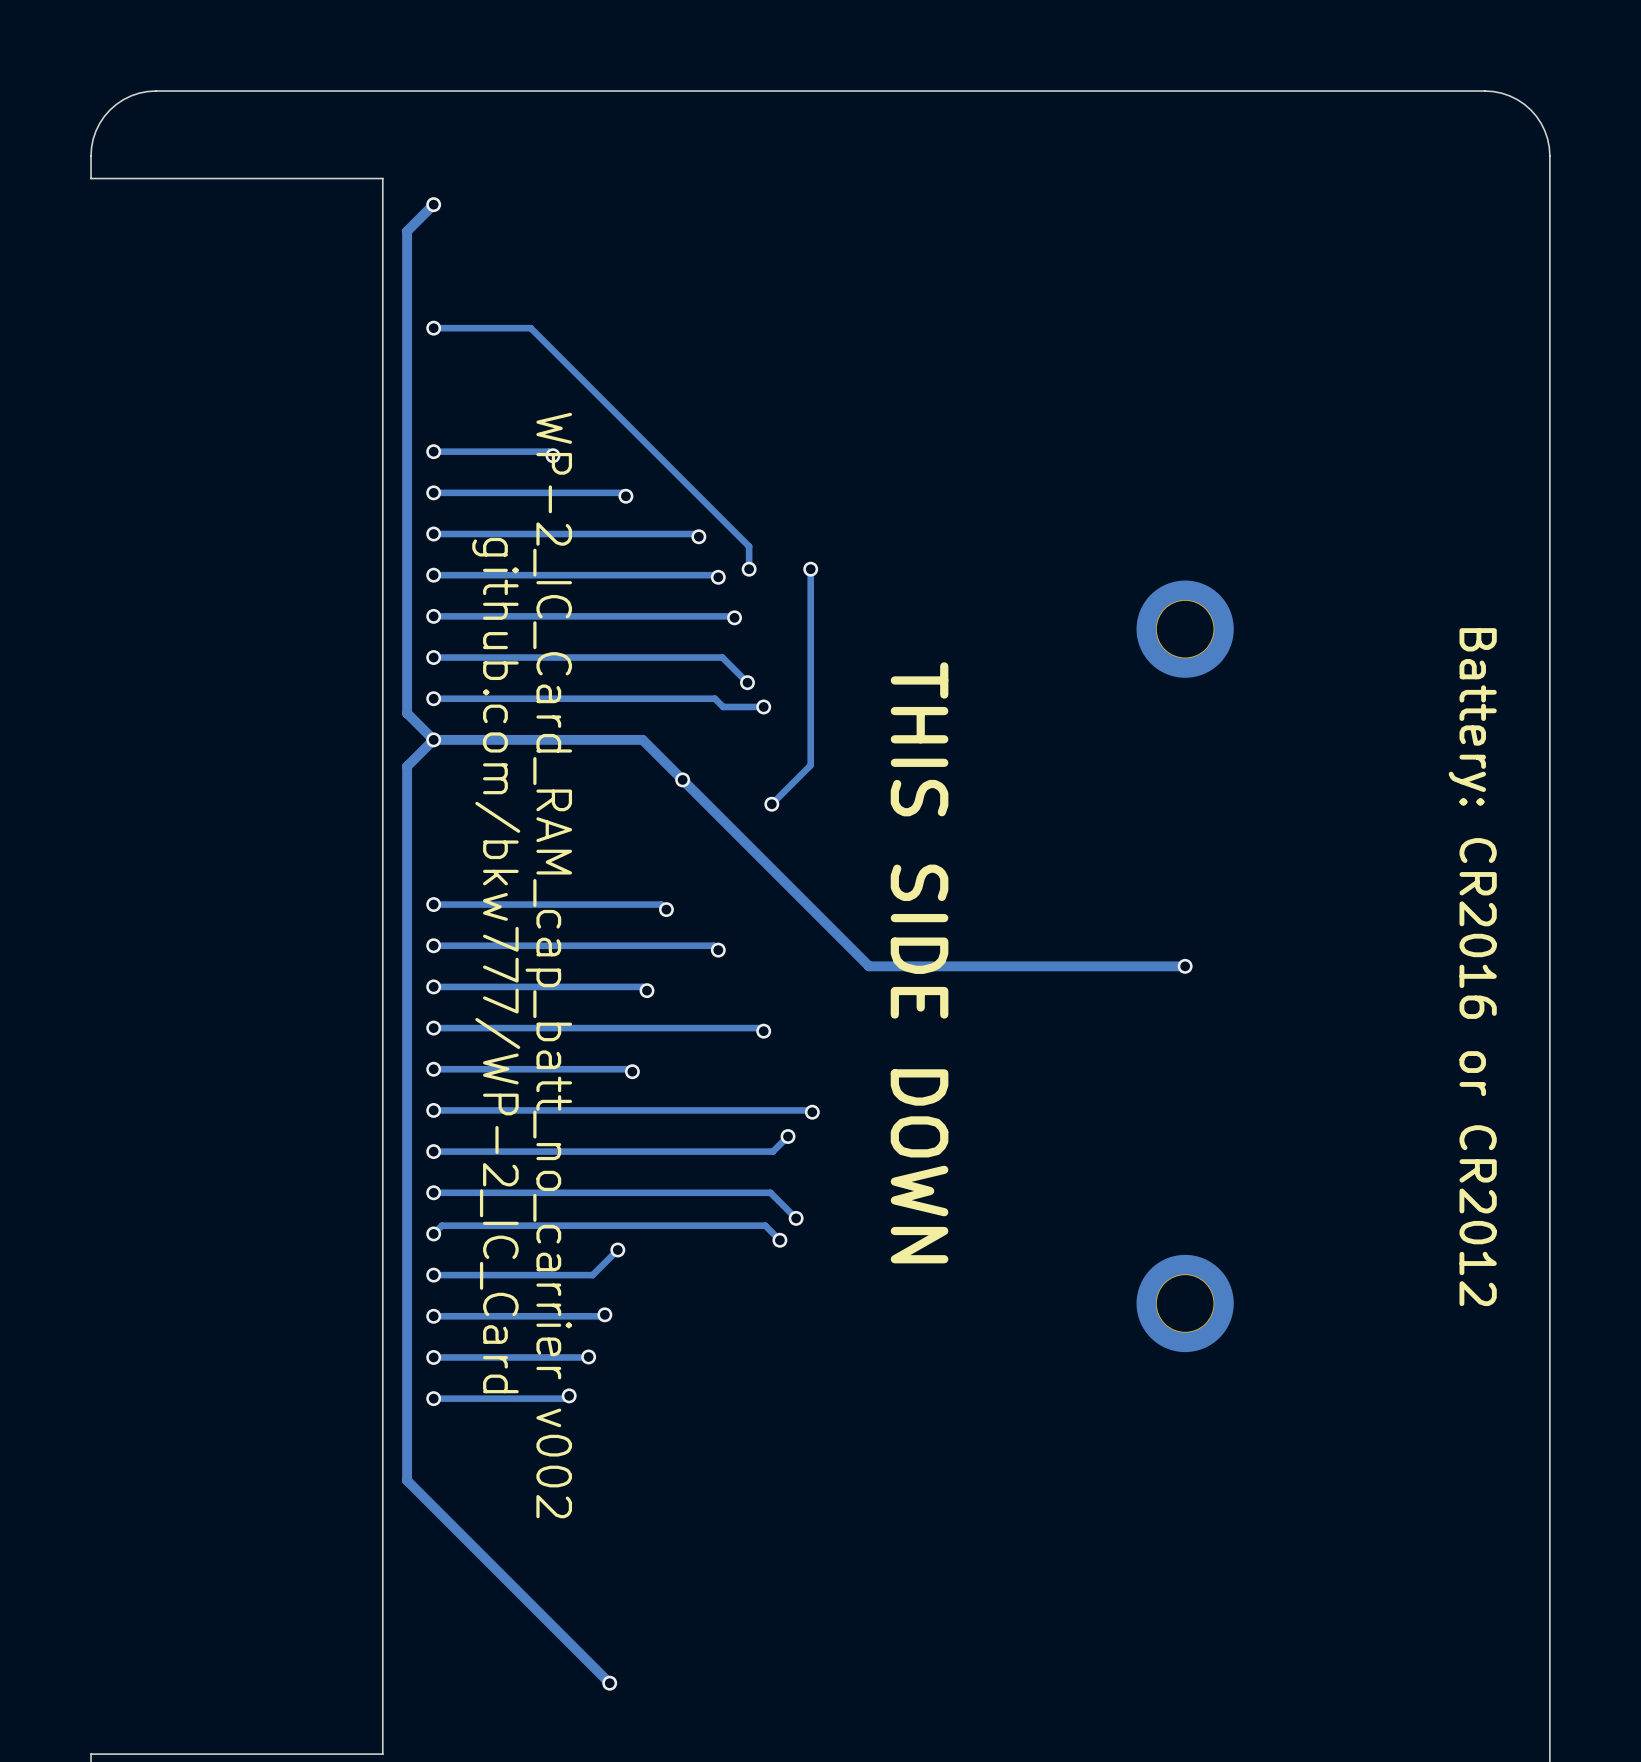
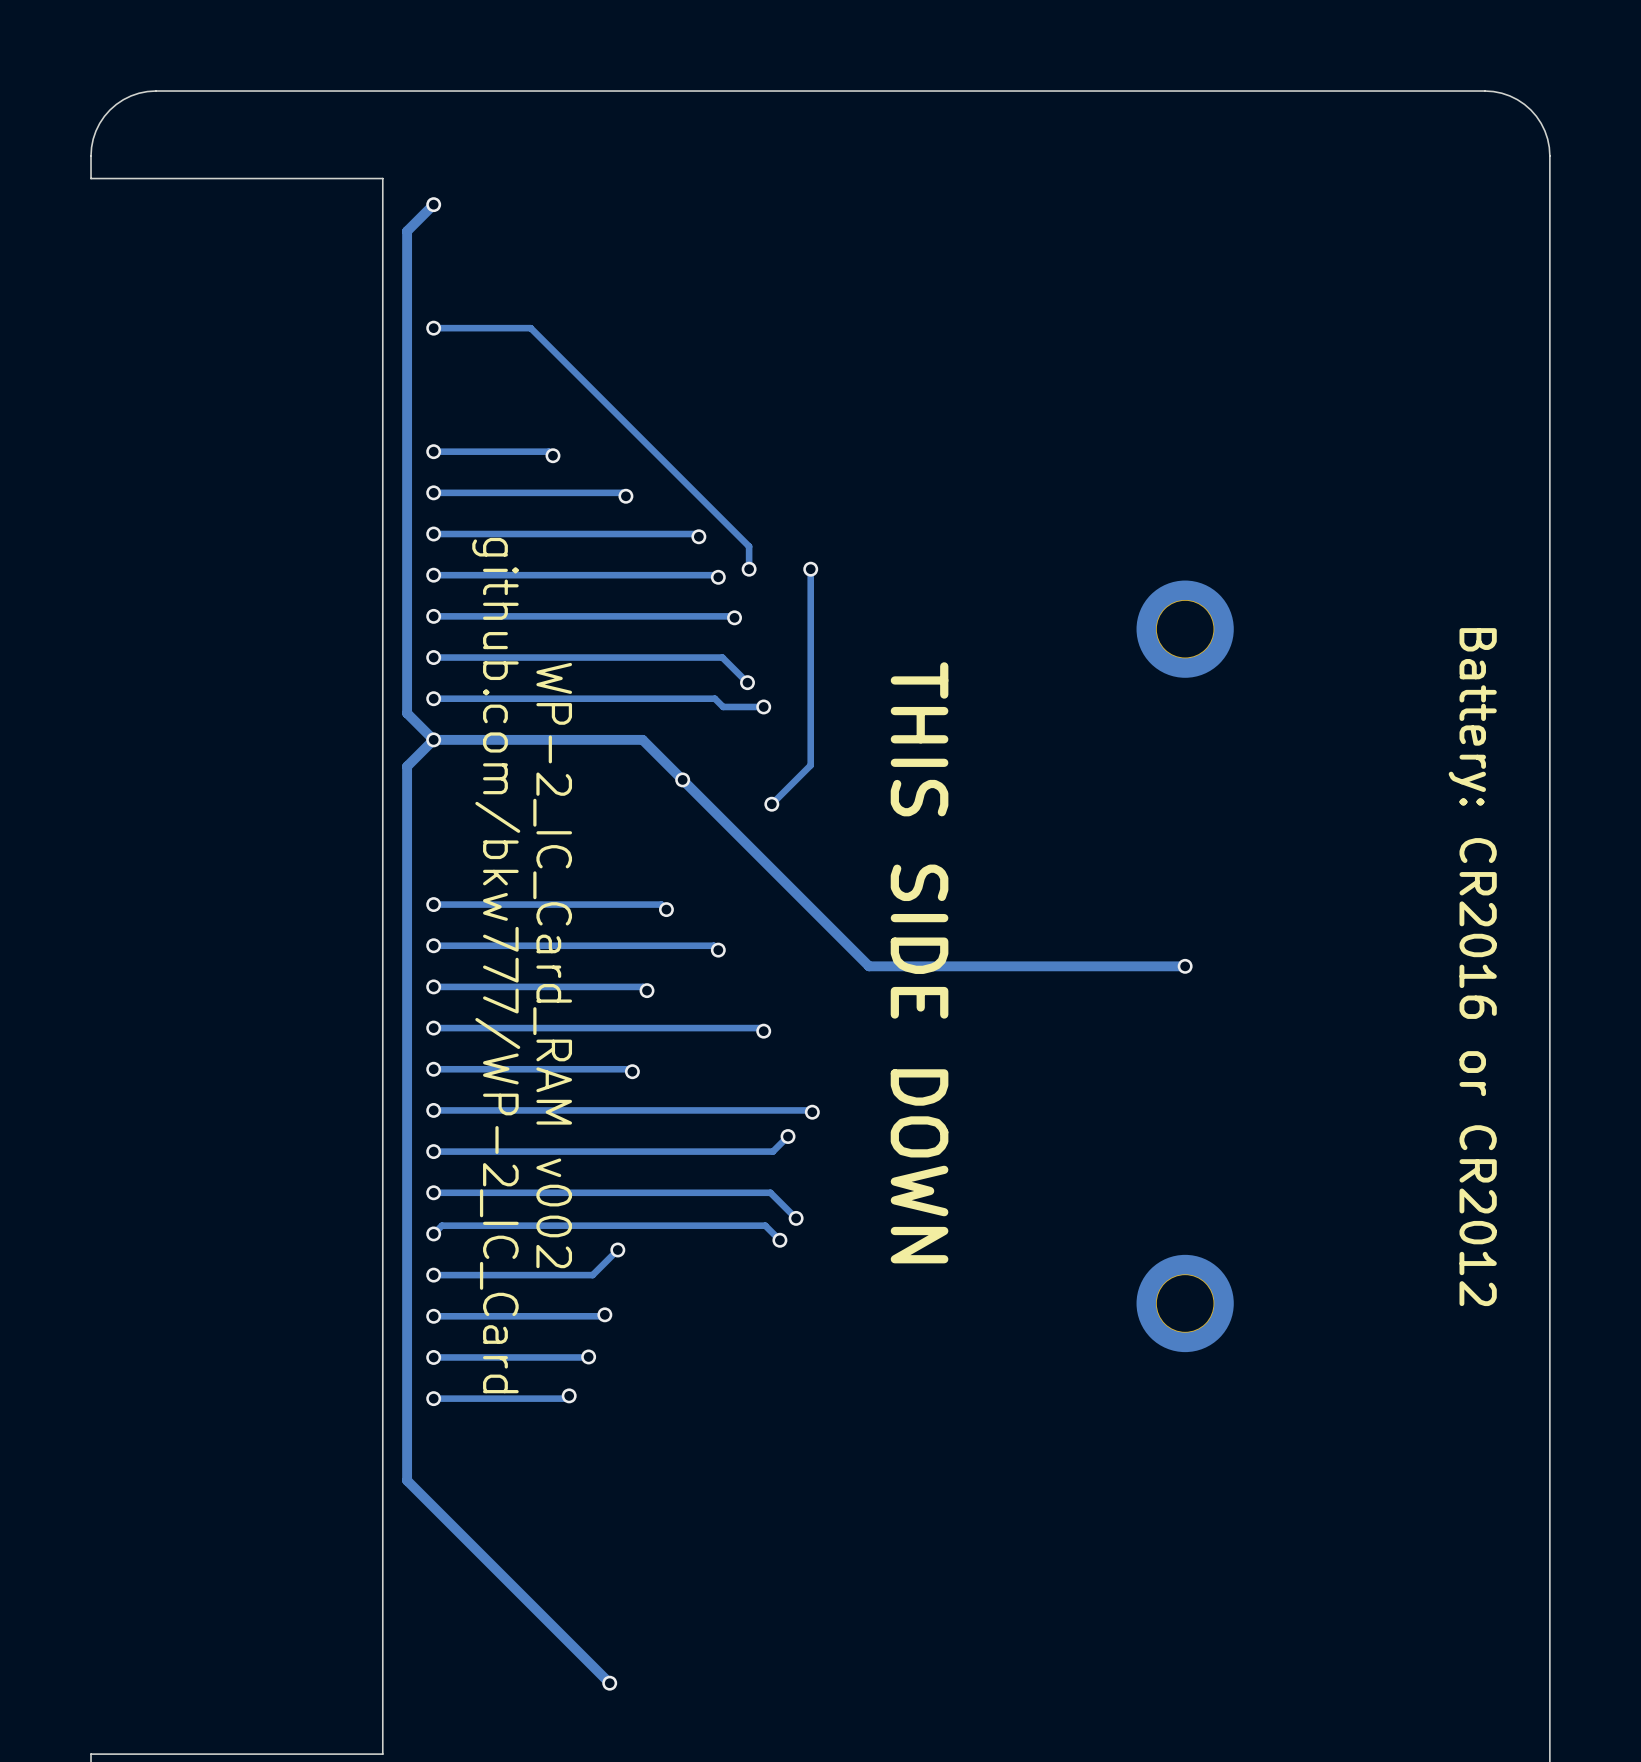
text: WP-2_IC_Card_RAM_cap_batt_no_carrier v002 (548, 965) -> WP-2_IC_Card_RAM v002 (552, 965)

